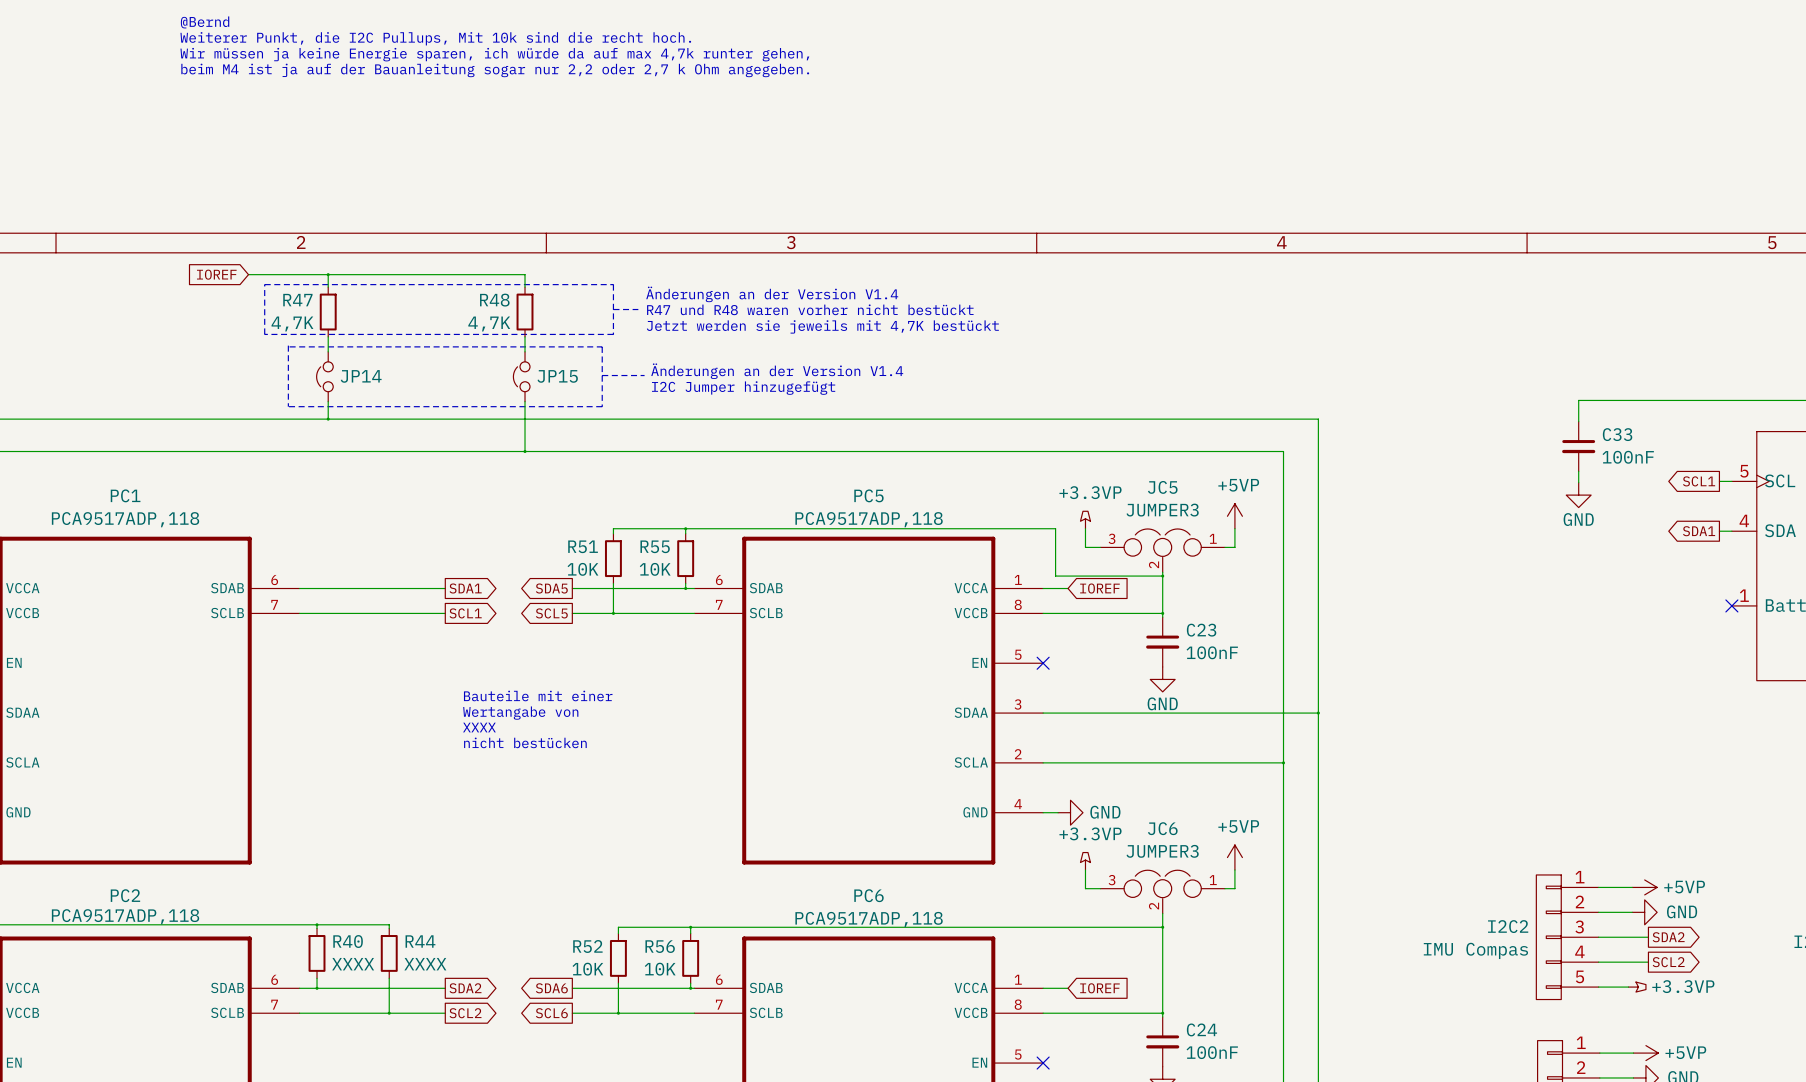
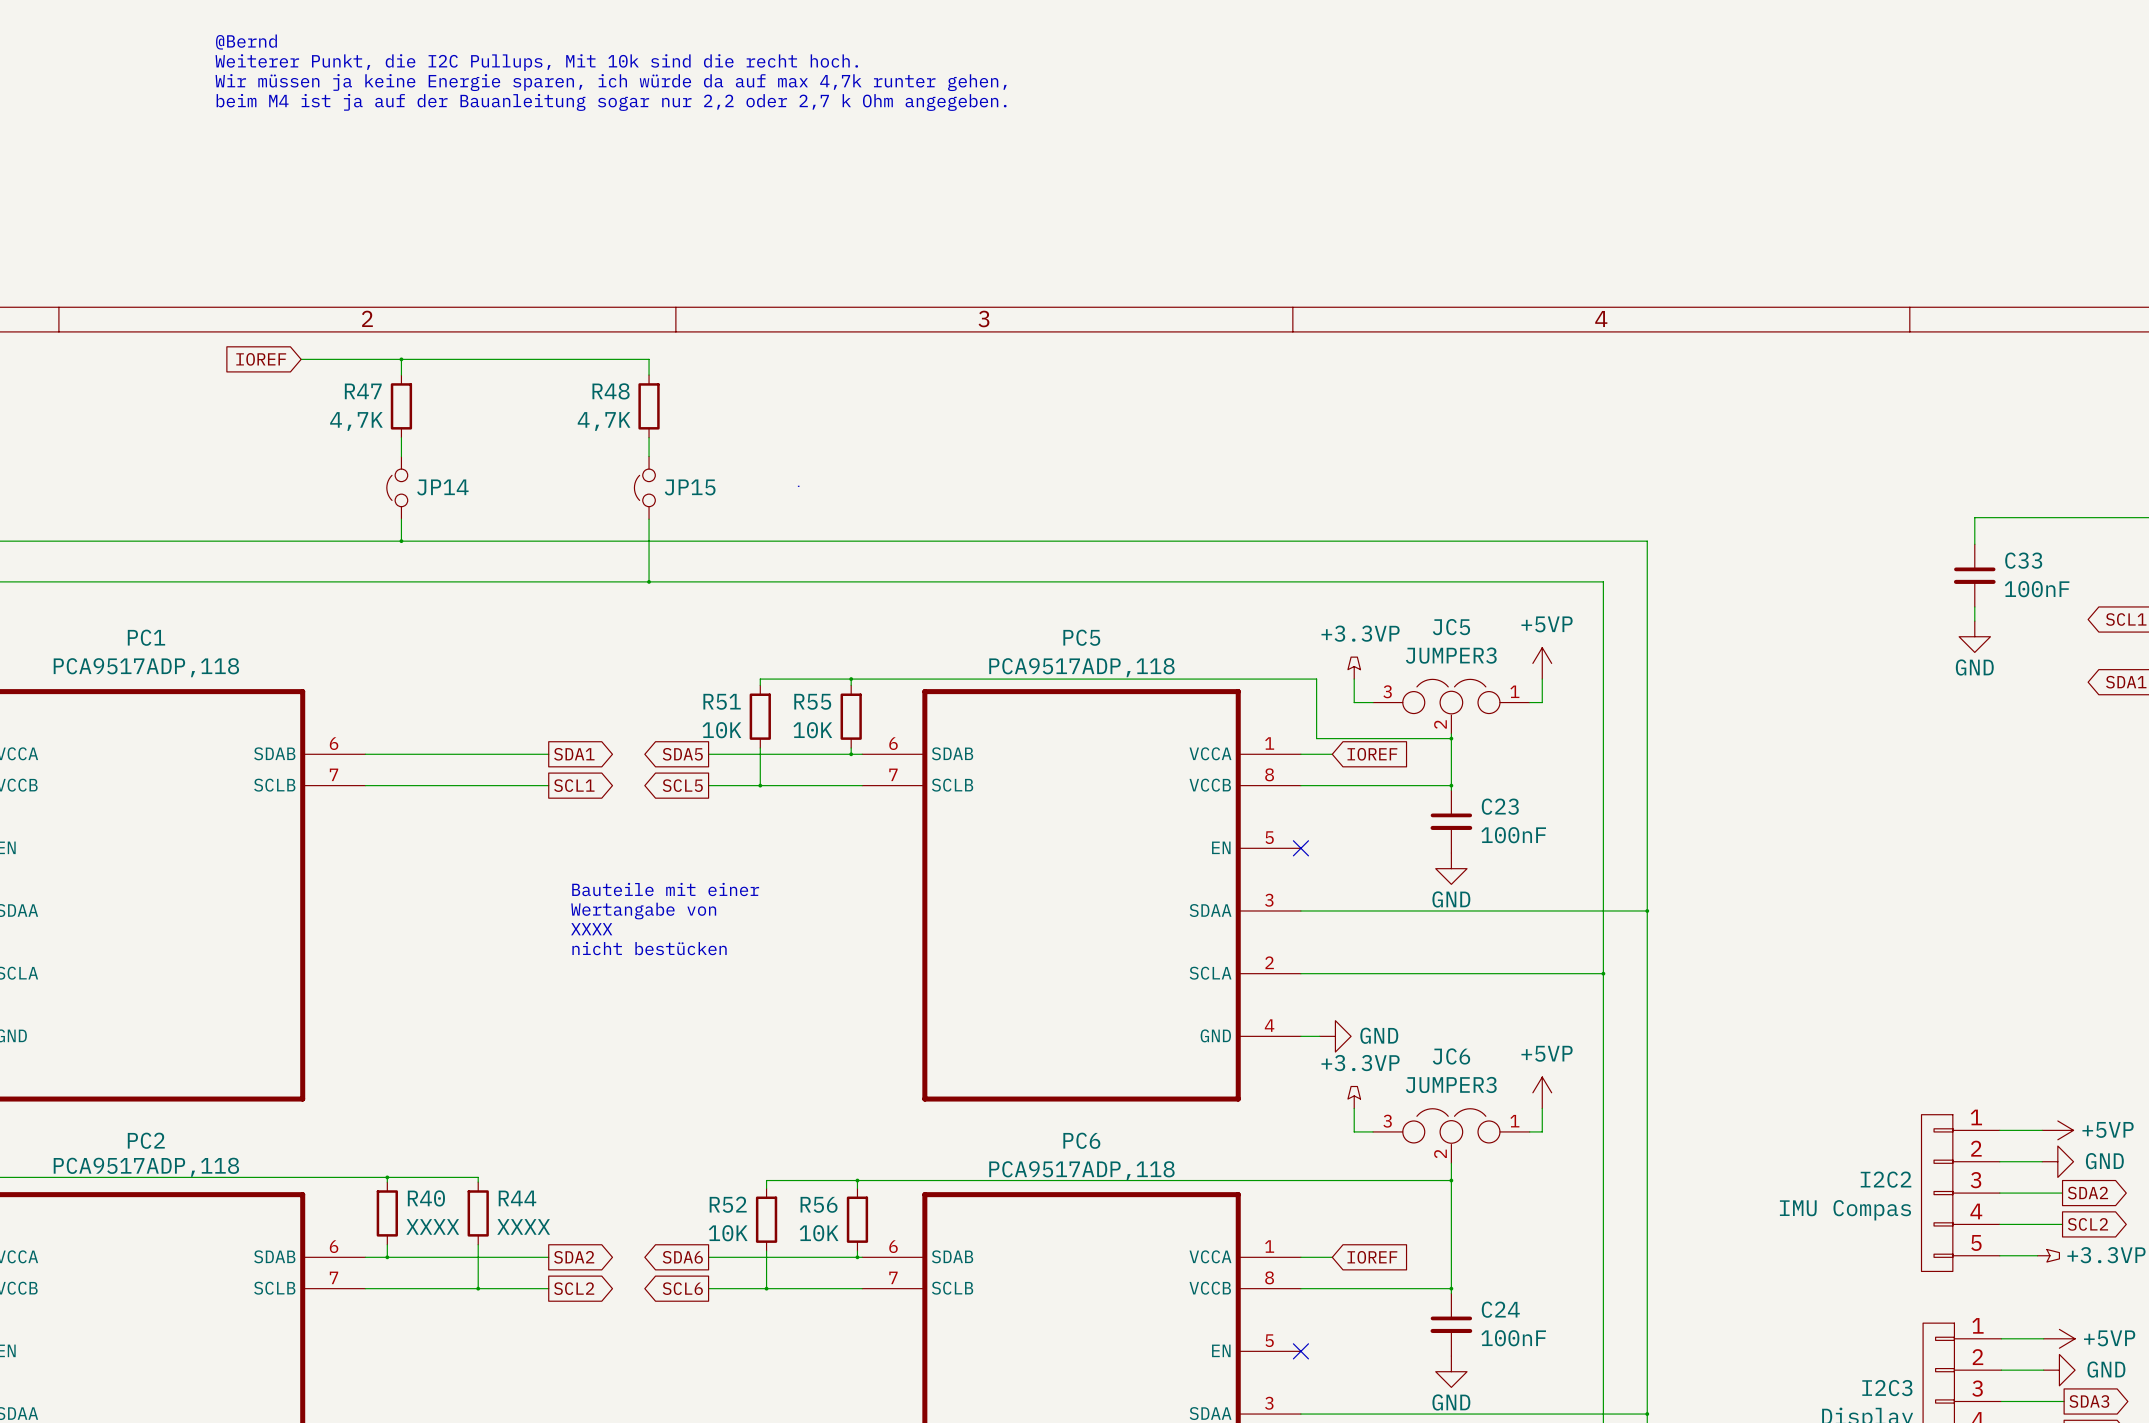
line: (264, 284) (613, 284) (613, 334) (264, 334) (264, 284) -> none
text: Änderungen an der Version V1.4 (772, 294) -> none
line: (613, 309) (638, 309) -> none
text: R47 und R48 waren vorher nicht bestückt (810, 309) -> none
text: Jetzt werden sie jeweils mit 4,7K bestückt (822, 326) -> none
line: (288, 345) (288, 406) (602, 406) (602, 346) (289, 346) -> none
text: Änderungen an der Version V1.4 (777, 371) -> none
line: (602, 375) (643, 375) -> none
text: I2C Jumper hinzugefügt (743, 388) -> none

